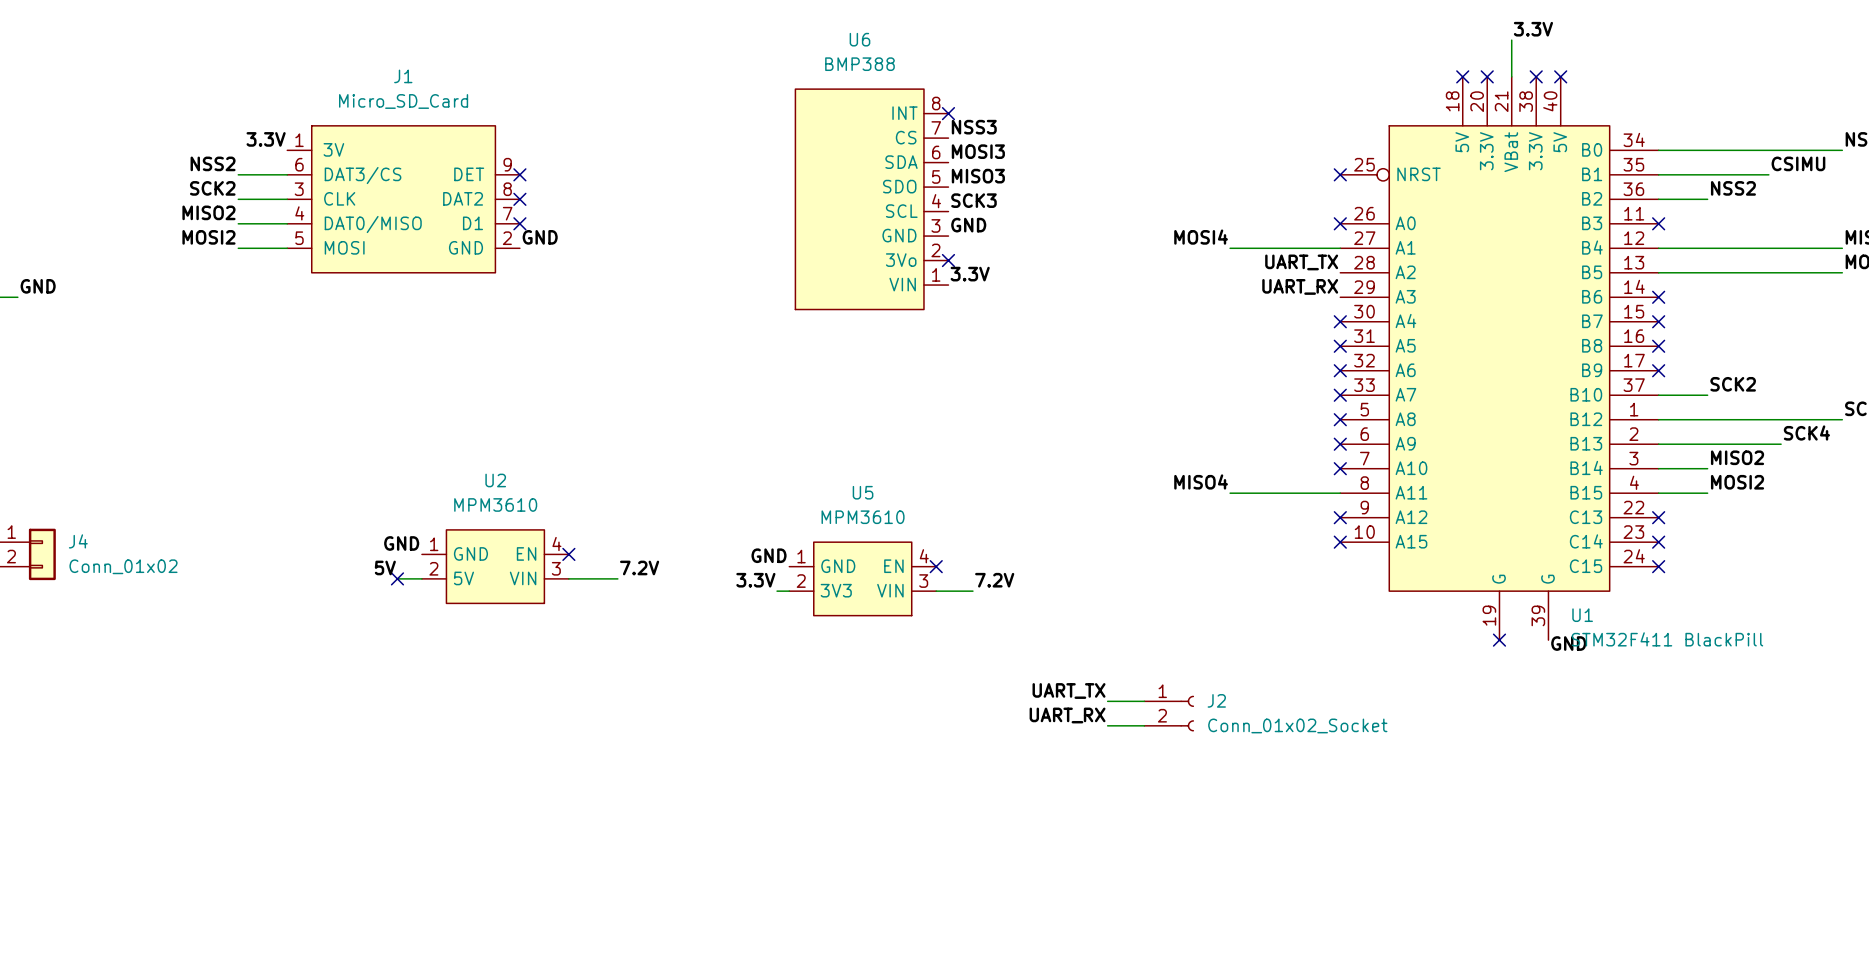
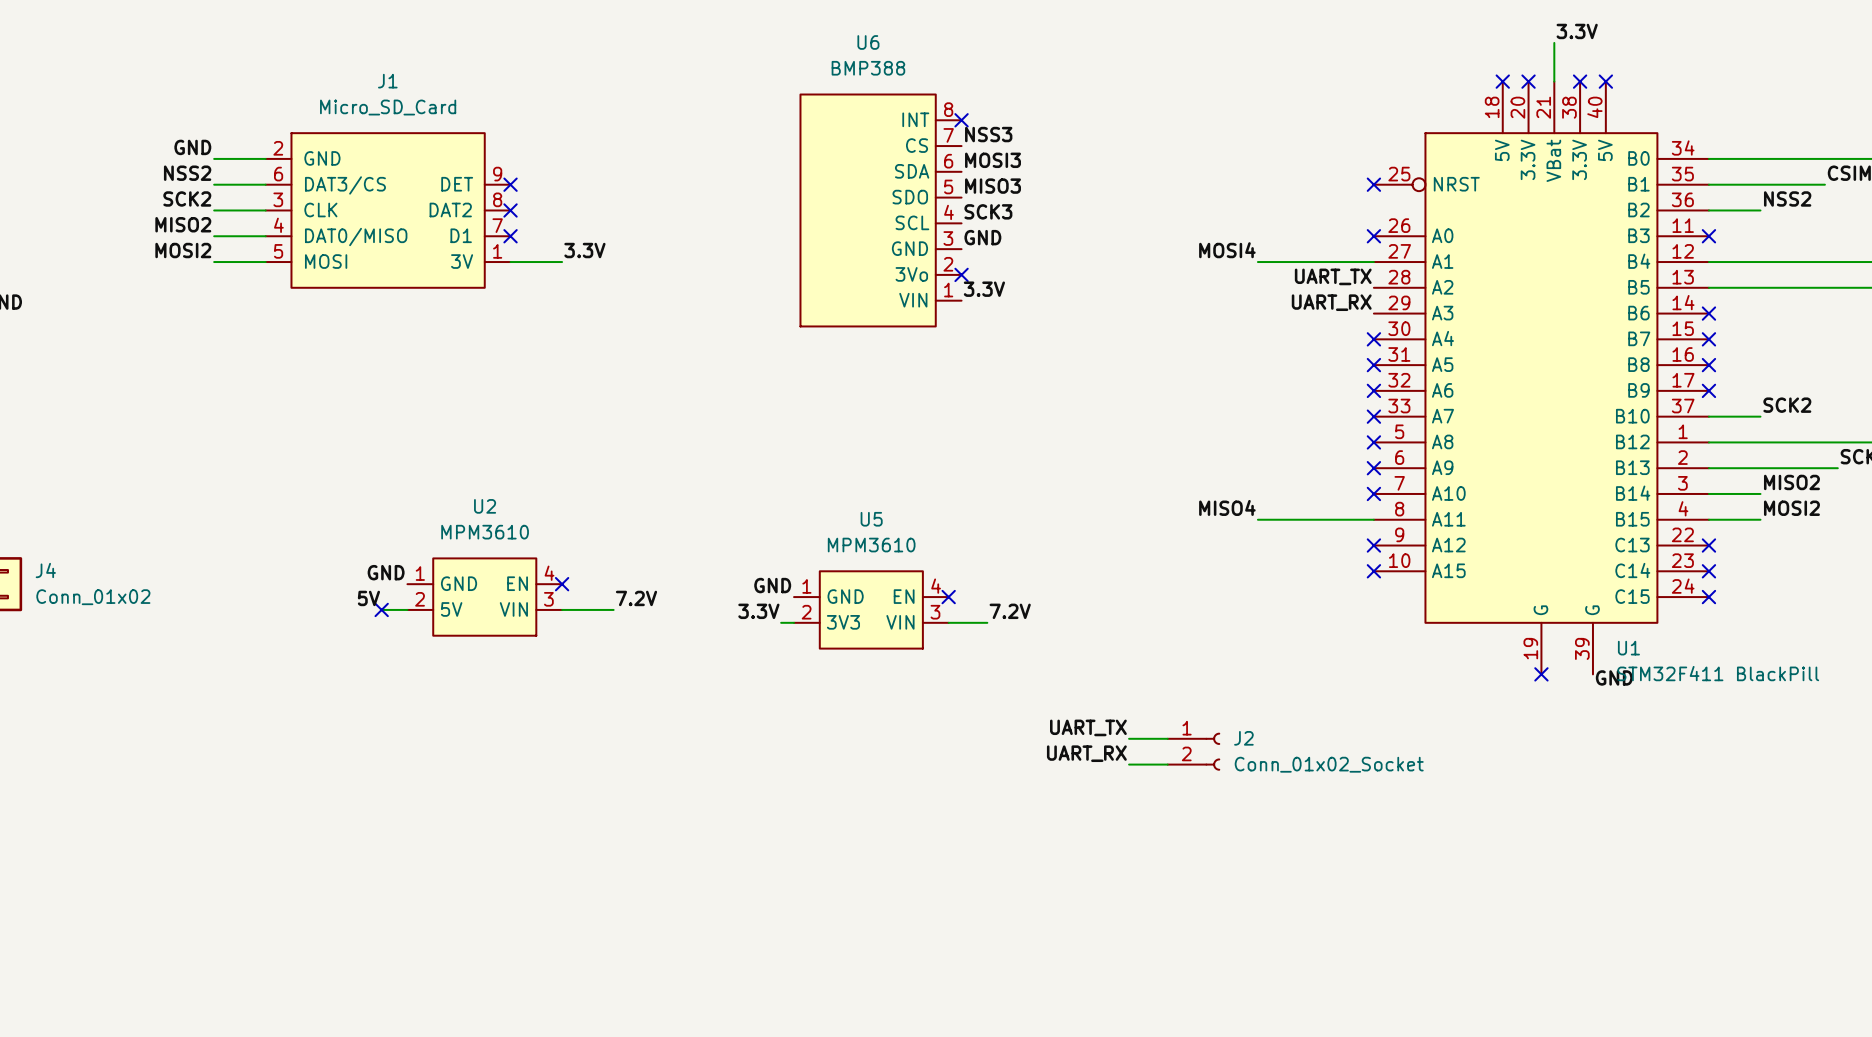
label: none -> GND (192, 147)
label: 3.3V (266, 139) -> none
J1 pin number: 1 (299, 140) -> 2 (278, 148)
J1 pin name: 3V (333, 149) -> GND (322, 158)
wire: none -> (214, 158) (265, 158)
label: GND (540, 237) -> none
label: none -> 3.3V (584, 250)
J1 pin number: 2 (507, 238) -> 1 (497, 251)
J1 pin name: GND (465, 247) -> 3V (462, 261)
wire: none -> (510, 262) (562, 262)

